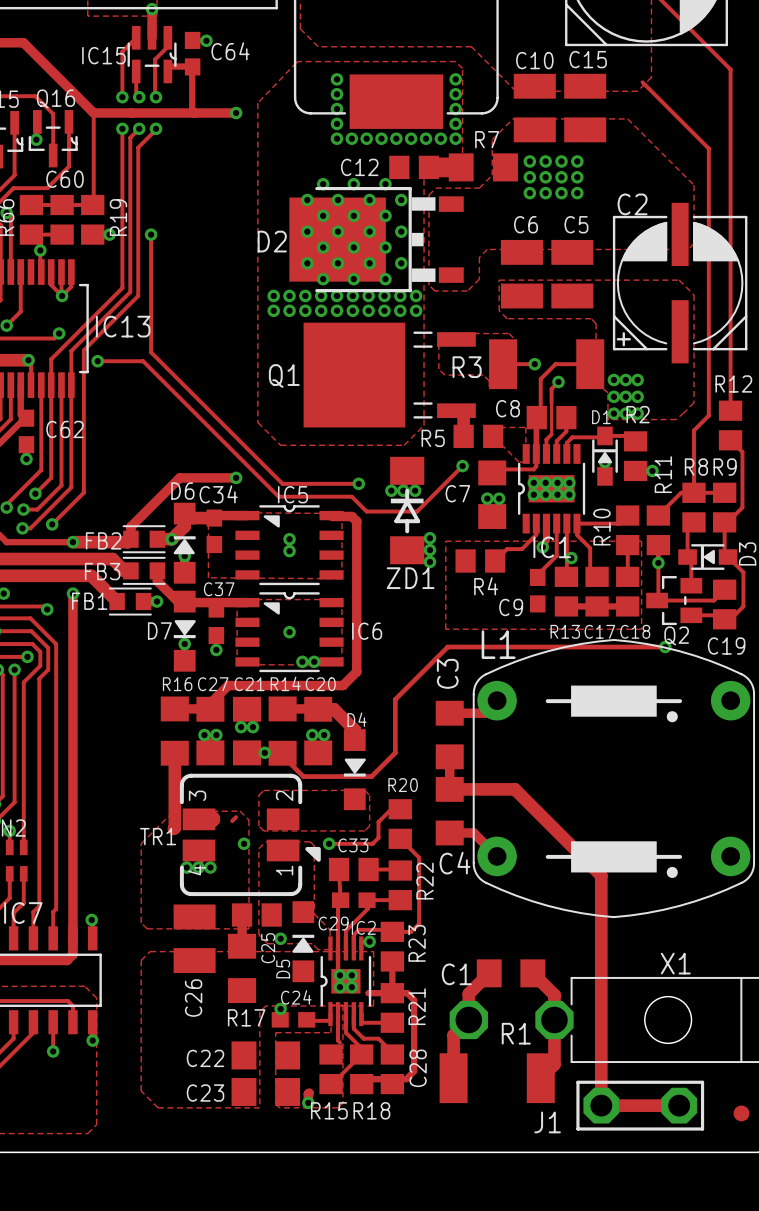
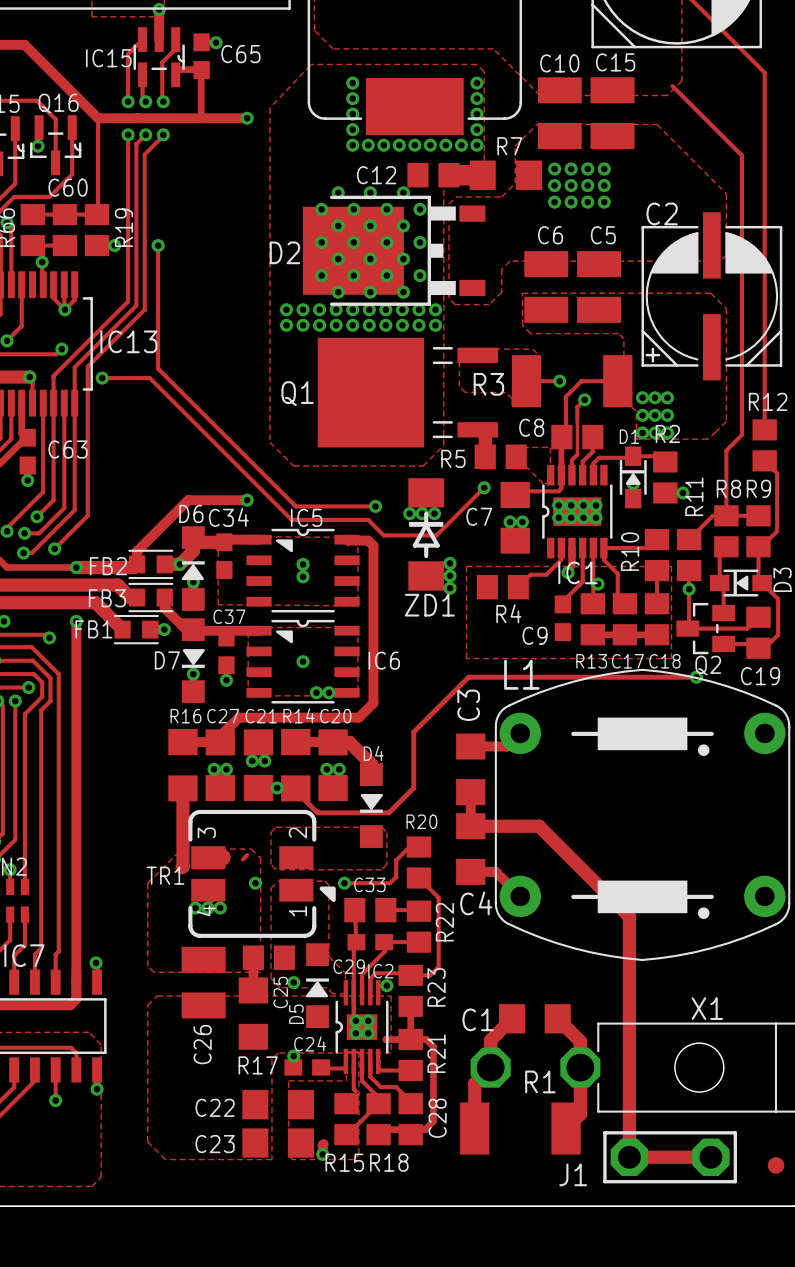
C64 name: C64 (230, 51) -> C65 (240, 54)
C62 name: C62 (65, 429) -> C63 (68, 449)

